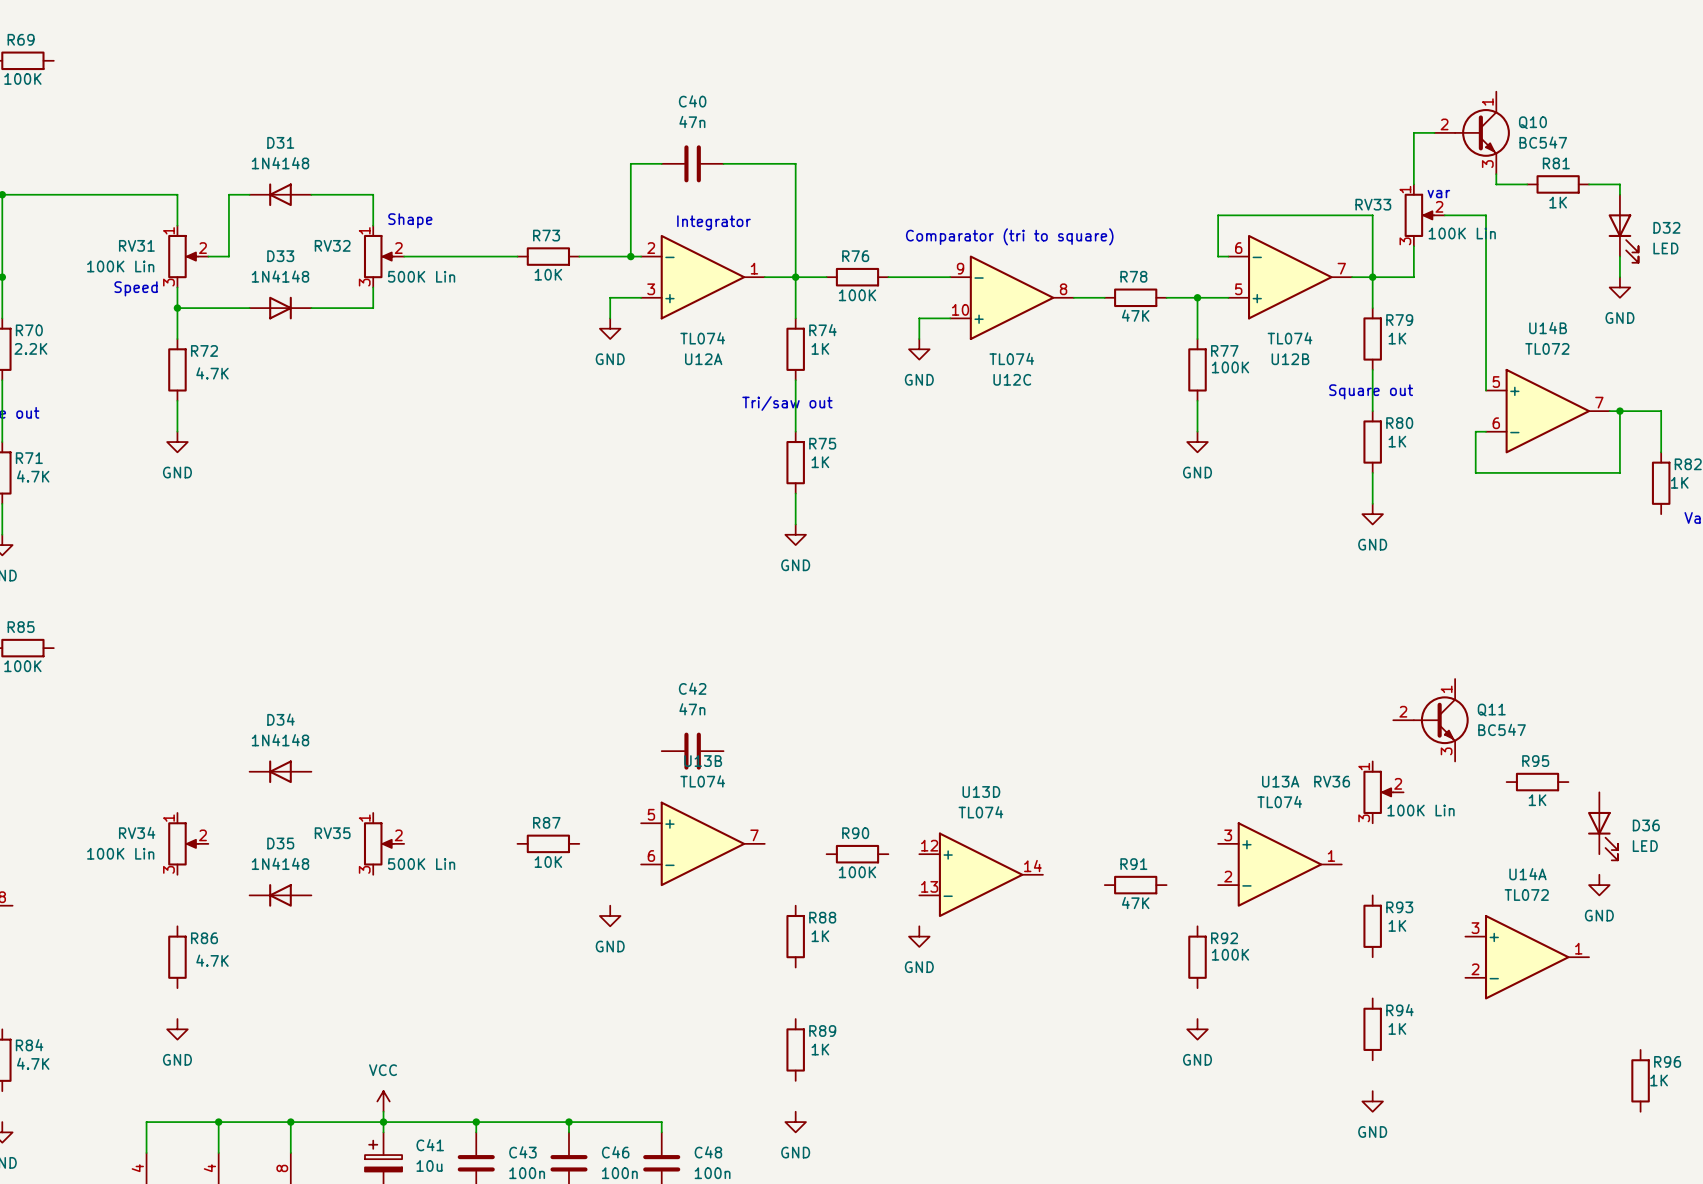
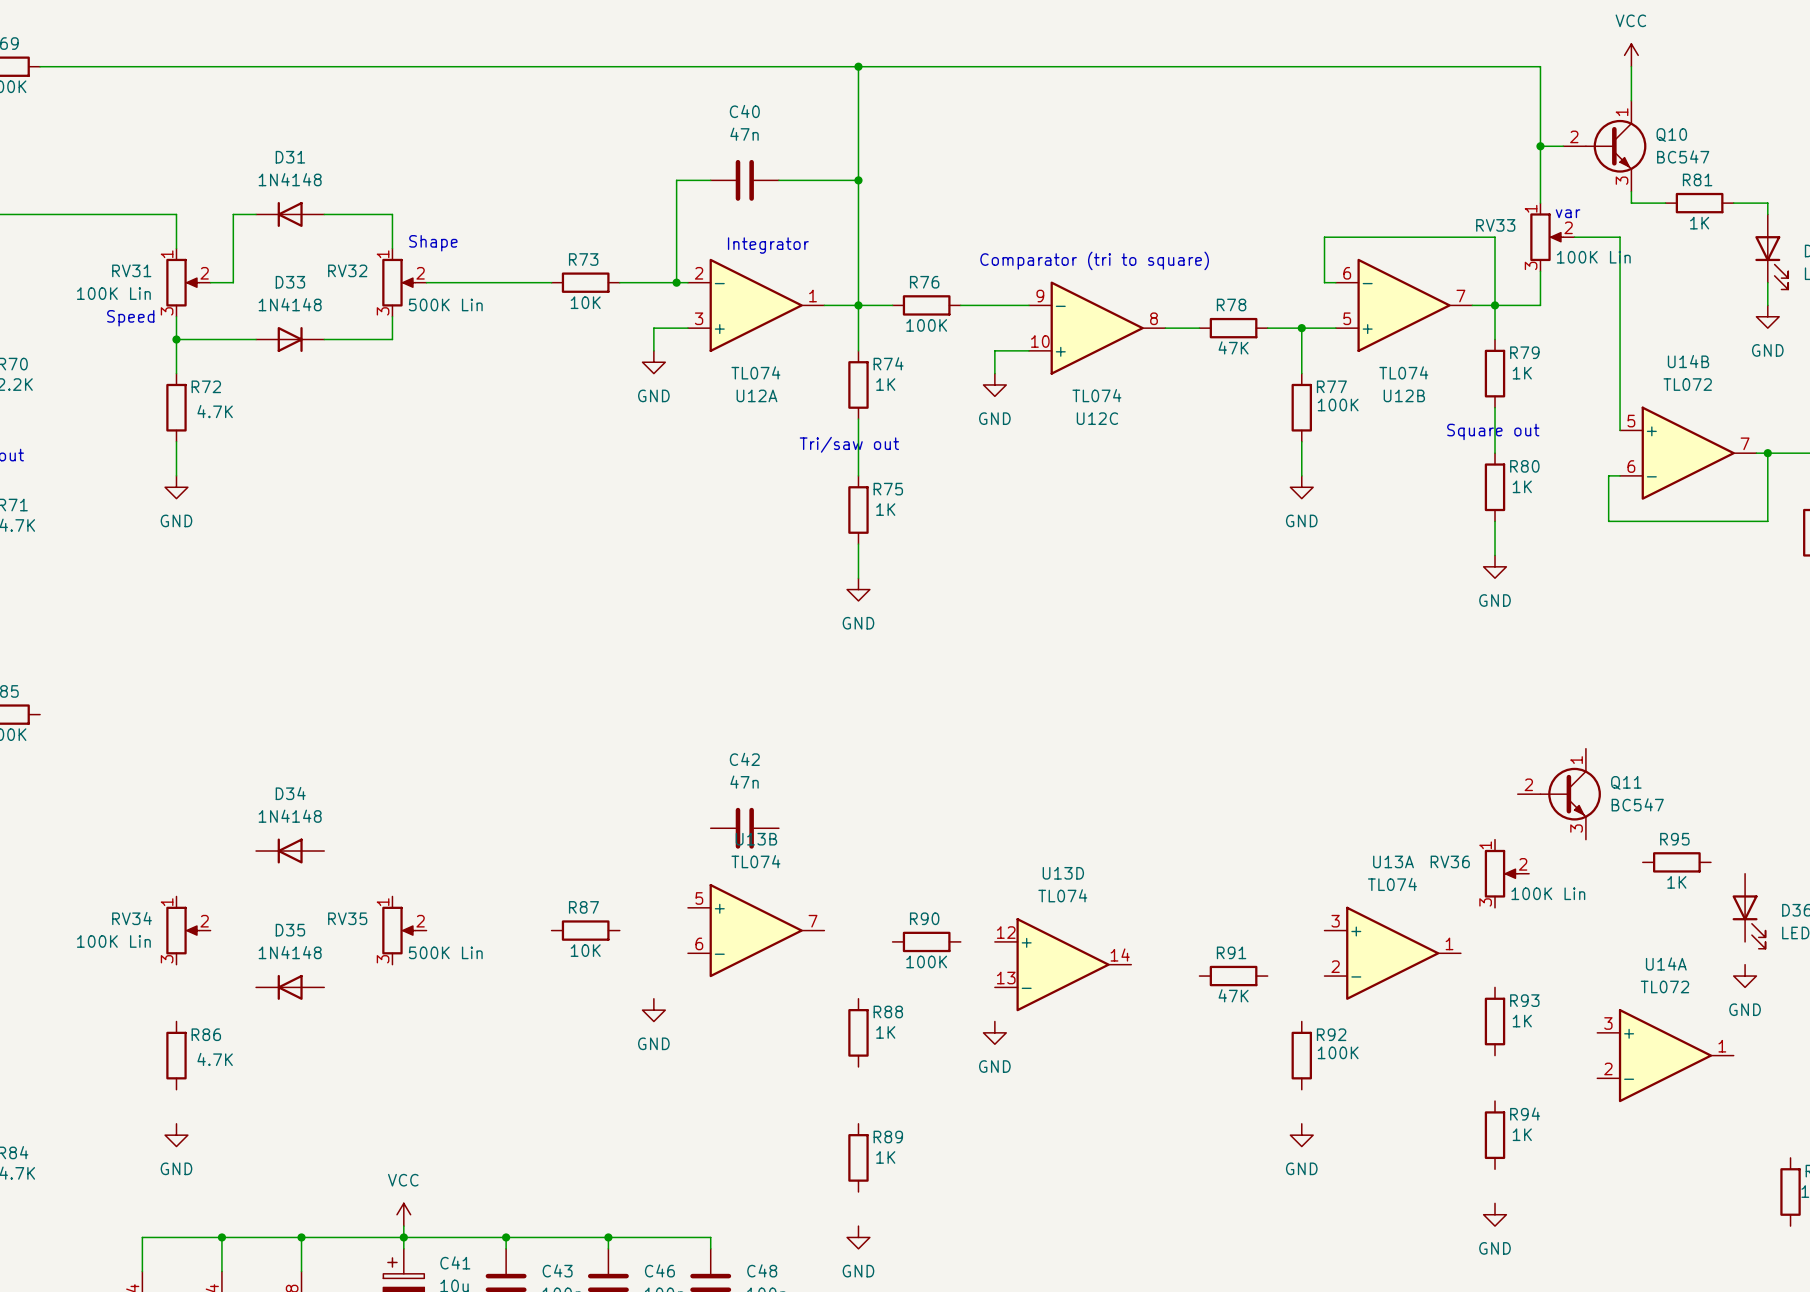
power symbol: none -> VCC (1631, 55)
wire: none -> (40, 66) (1540, 66) (1540, 146)
wire: none -> (858, 66) (858, 180)
junction: none -> (858, 66)
wire: none -> (1631, 66) (1631, 100)
junction: none -> (1540, 146)
junction: none -> (858, 180)

